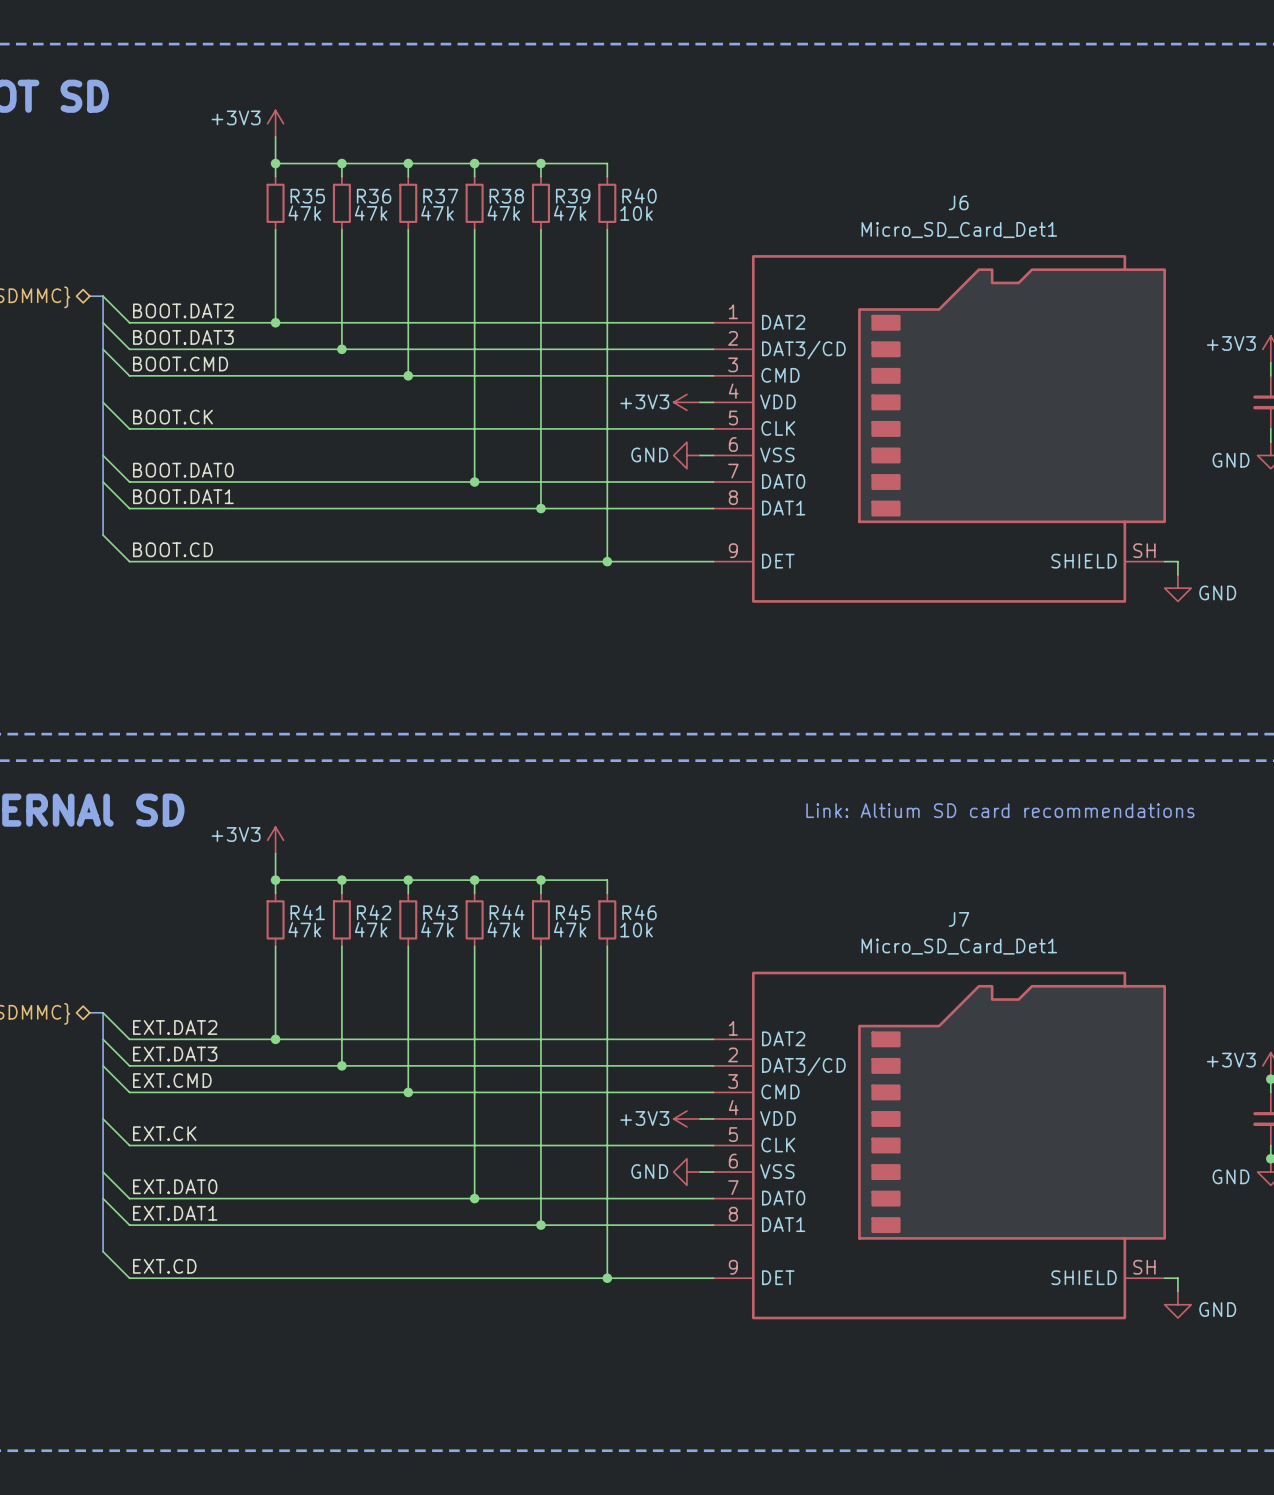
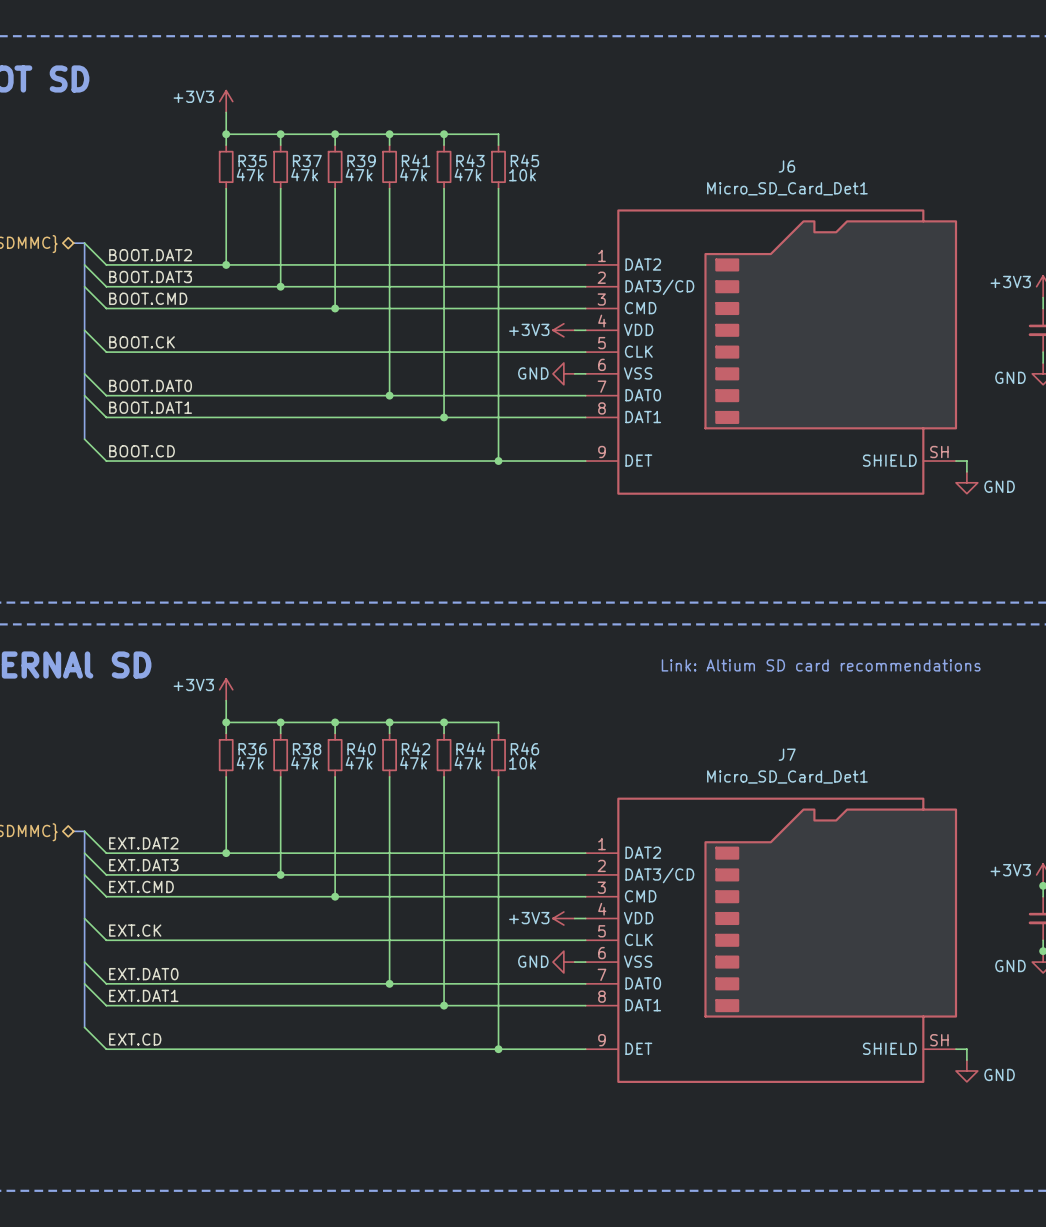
R40 name: R40 (639, 195) -> R45 (524, 160)
R36 name: R36 (374, 196) -> R37 (307, 161)
R37 name: R37 (440, 196) -> R39 (361, 161)
R38 name: R38 (506, 196) -> R41 (415, 160)
R39 name: R39 (573, 196) -> R43 (470, 160)
R41 name: R41 (307, 912) -> R36 (252, 749)
R42 name: R42 (374, 912) -> R38 (307, 749)
R43 name: R43 (440, 912) -> R40 (361, 748)
R44 name: R44 (507, 912) -> R42 (415, 748)
R45 name: R45 (573, 912) -> R44 (470, 748)

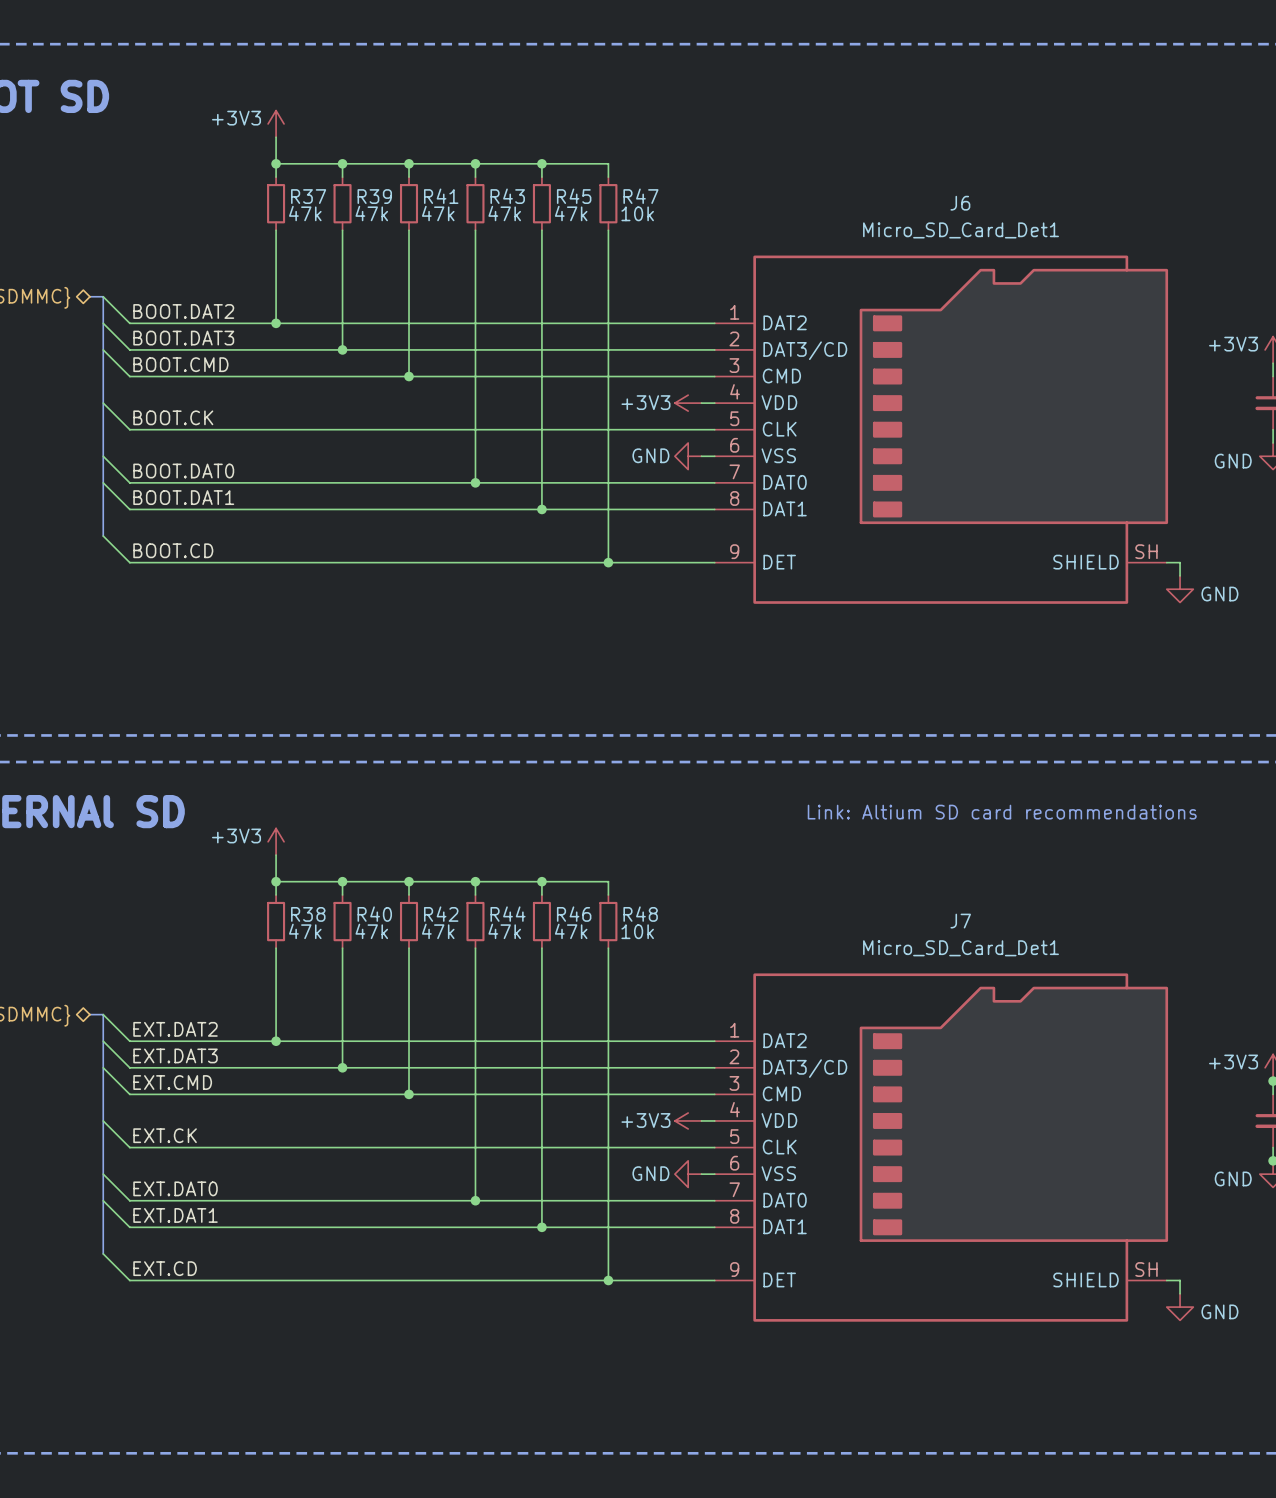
R41 name: R41 (415, 160) -> R43 (507, 196)
R43 name: R43 (470, 160) -> R45 (574, 196)
R45 name: R45 (524, 160) -> R47 (640, 196)
R35 name: R35 (252, 161) -> R37 (308, 196)
R37 name: R37 (307, 161) -> R39 (374, 196)
R39 name: R39 (361, 161) -> R41 (441, 196)
R40 name: R40 (361, 748) -> R42 (441, 914)
R42 name: R42 (415, 748) -> R44 (508, 914)
R44 name: R44 (470, 748) -> R46 (574, 914)
R46 name: R46 (524, 748) -> R48 (640, 914)
R36 name: R36 (252, 749) -> R38 (308, 914)
R38 name: R38 (307, 749) -> R40 (374, 914)

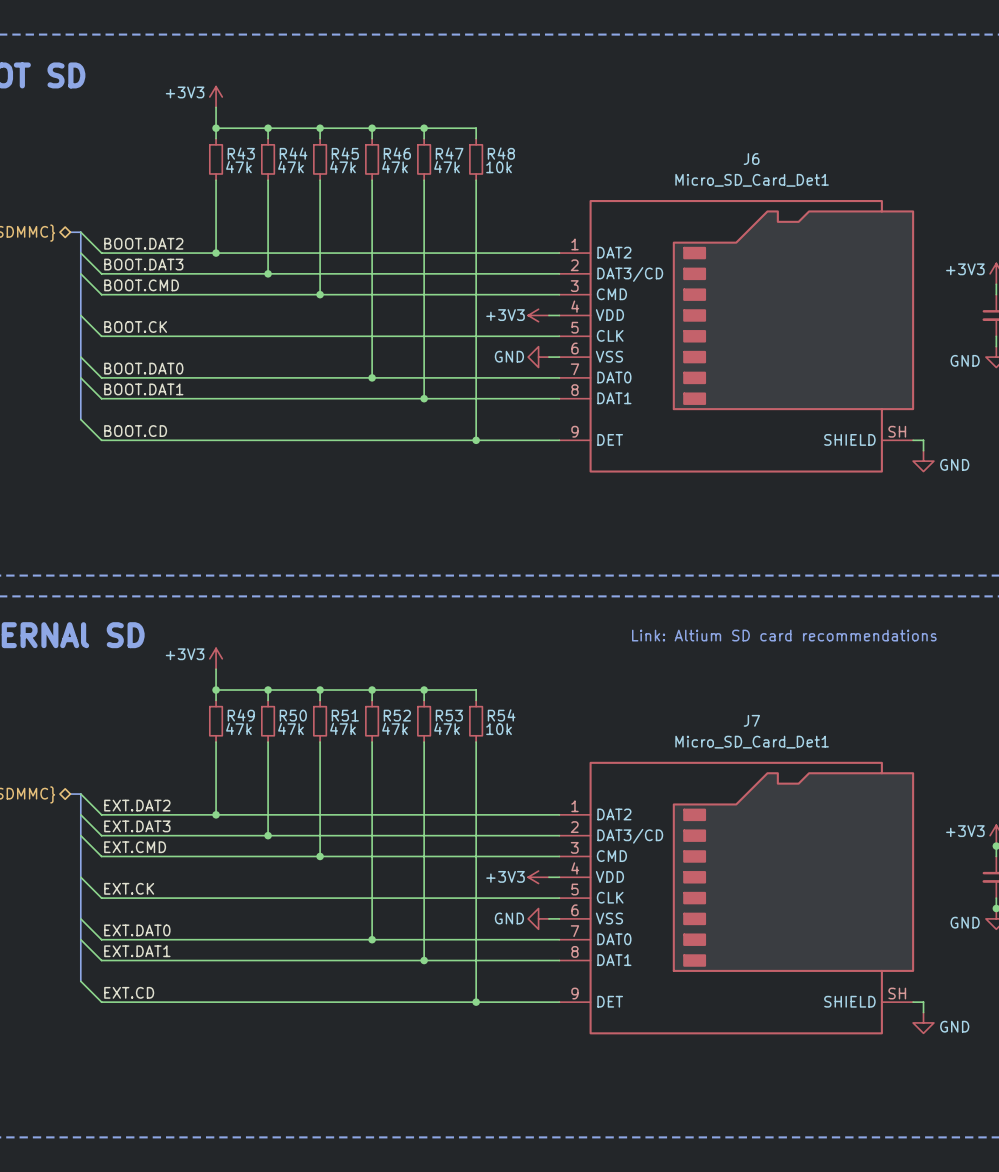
R37 name: R37 (308, 196) -> R43 (241, 153)
R39 name: R39 (374, 196) -> R44 (293, 153)
R41 name: R41 (441, 196) -> R45 (345, 153)
R43 name: R43 (507, 196) -> R46 (397, 153)
R45 name: R45 (574, 196) -> R47 (449, 153)
R47 name: R47 (640, 196) -> R48 (501, 153)
R38 name: R38 (308, 914) -> R49 (241, 715)
R40 name: R40 (374, 914) -> R50 (293, 715)
R42 name: R42 (441, 914) -> R51 (345, 715)
R44 name: R44 (508, 914) -> R52 (397, 715)
R46 name: R46 (574, 914) -> R53 (449, 715)
R48 name: R48 (640, 914) -> R54 (501, 715)

